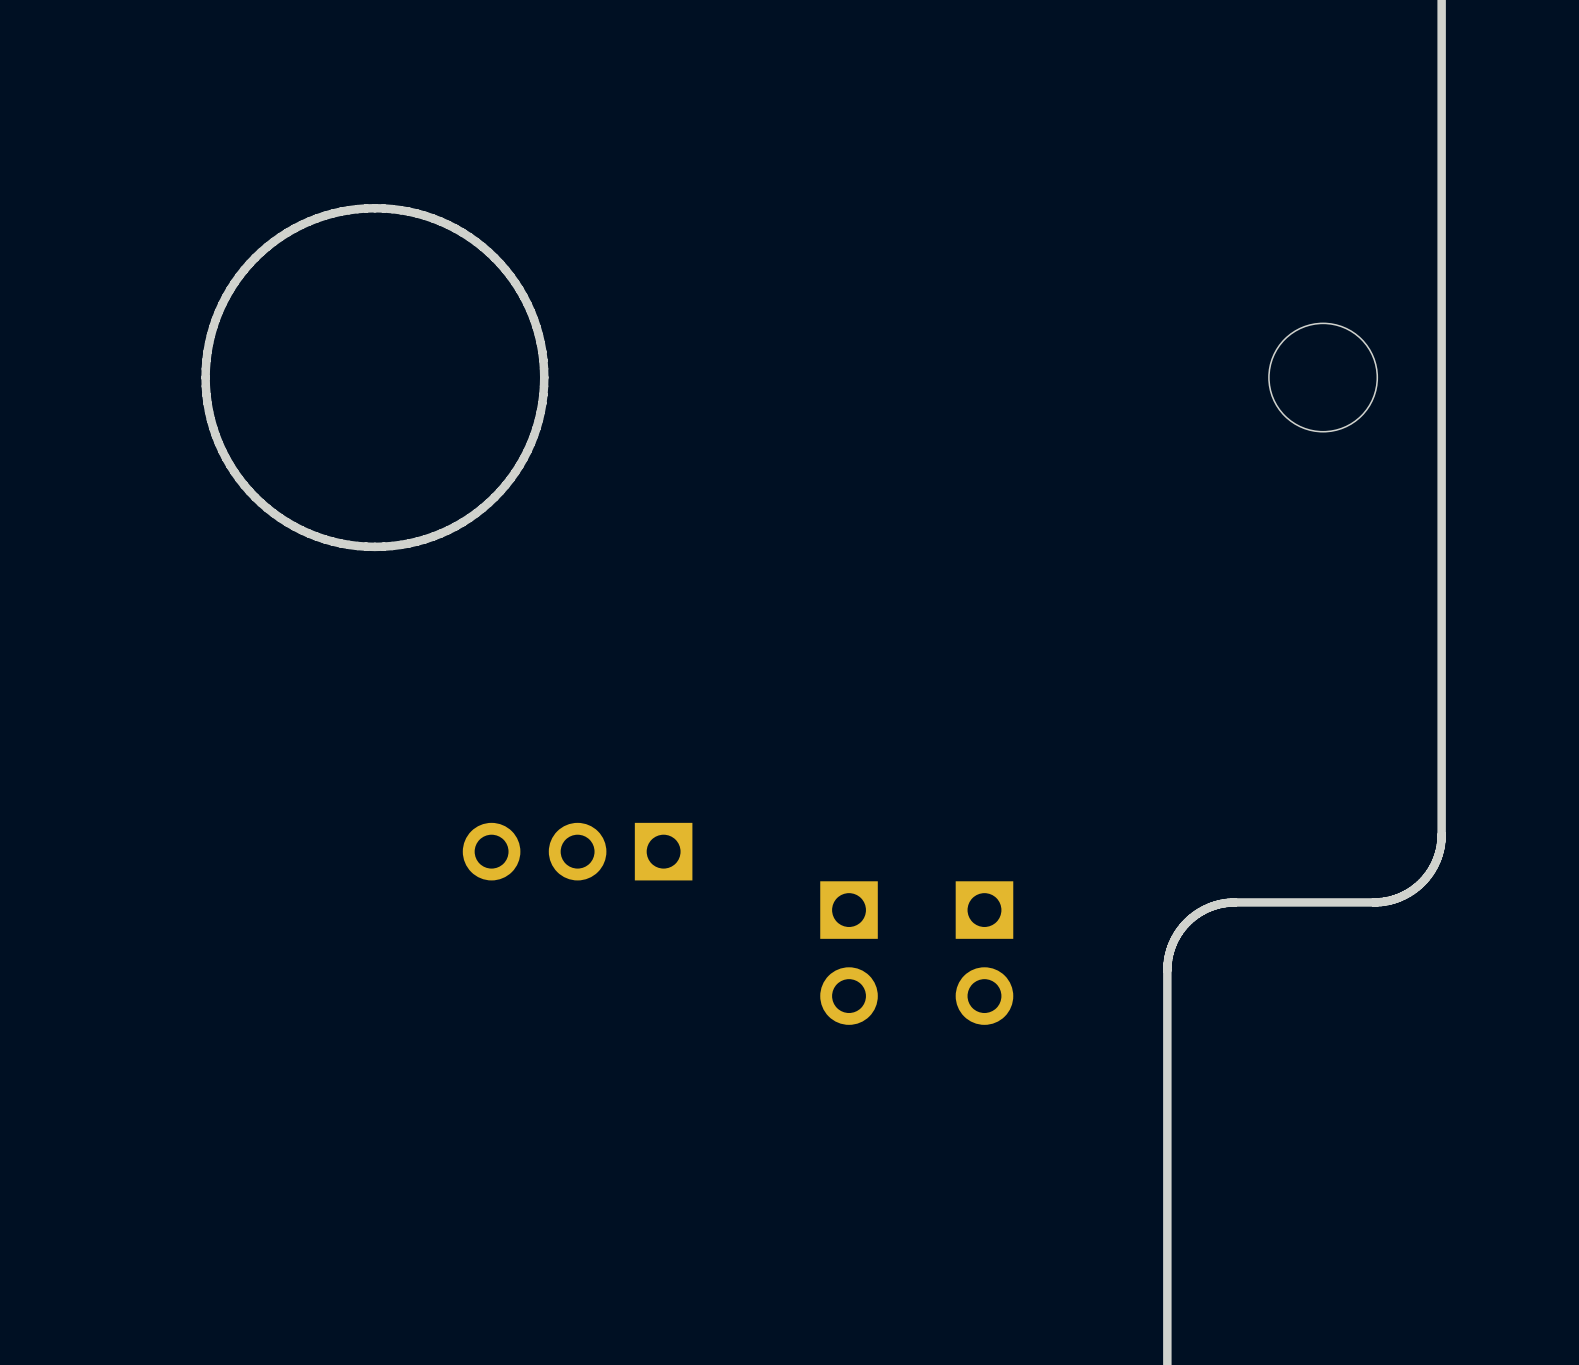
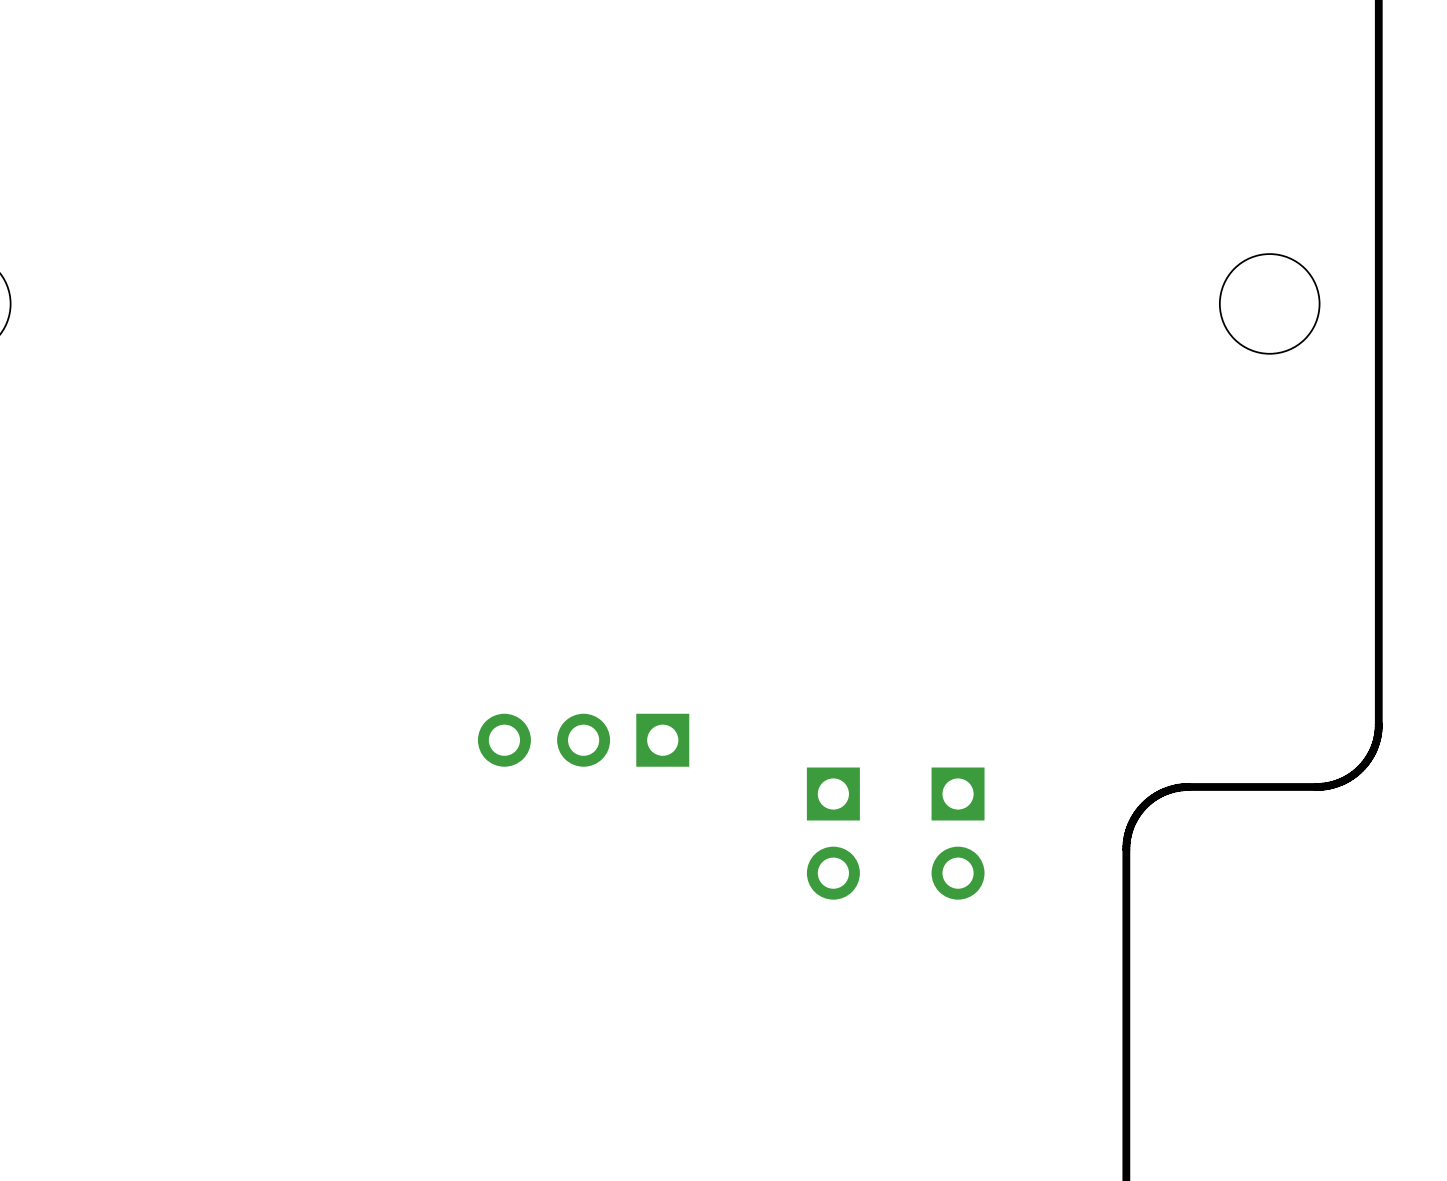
board edge: (374, 208) (409, 211) (440, 221) (469, 237) (494, 257) (515, 282) (530, 311) (540, 343) (544, 377) (540, 411) (530, 443) (515, 472) (494, 497) (469, 517) (440, 533) (409, 543) (374, 546) (340, 543) (309, 533) (280, 517) (255, 497) (234, 472) (218, 443) (209, 411) (205, 377) (209, 343) (218, 311) (234, 282) (255, 257) (280, 237) (309, 221) (340, 211) (374, 208) -> none

